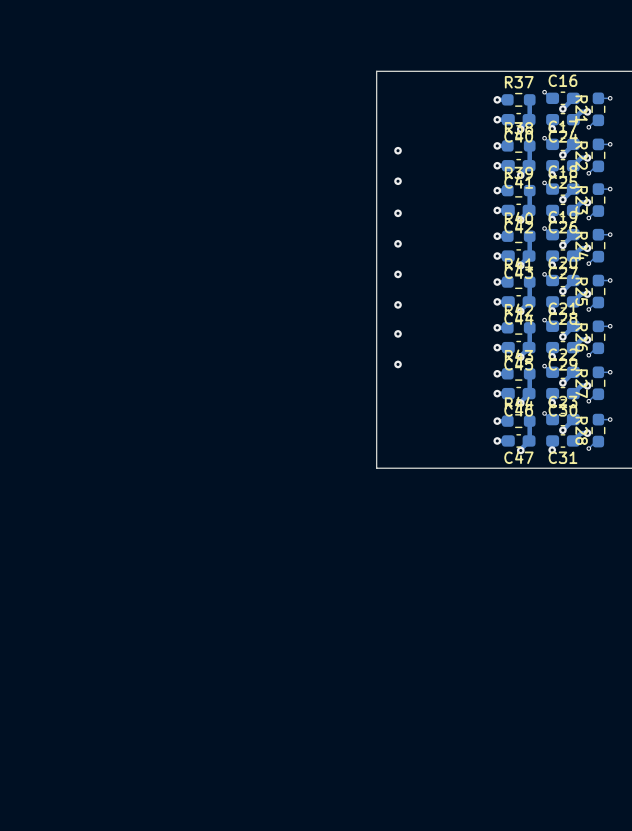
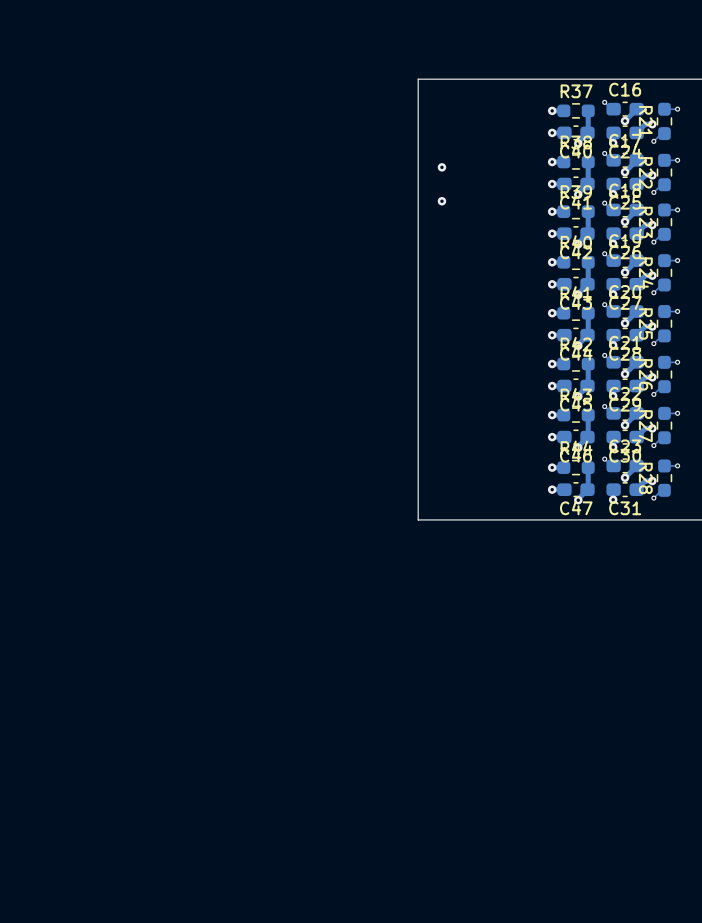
via: (398, 213) -> none
via: (398, 243) -> none
via: (398, 274) -> none
via: (398, 304) -> none
via: (398, 333) -> none
via: (398, 364) -> none

